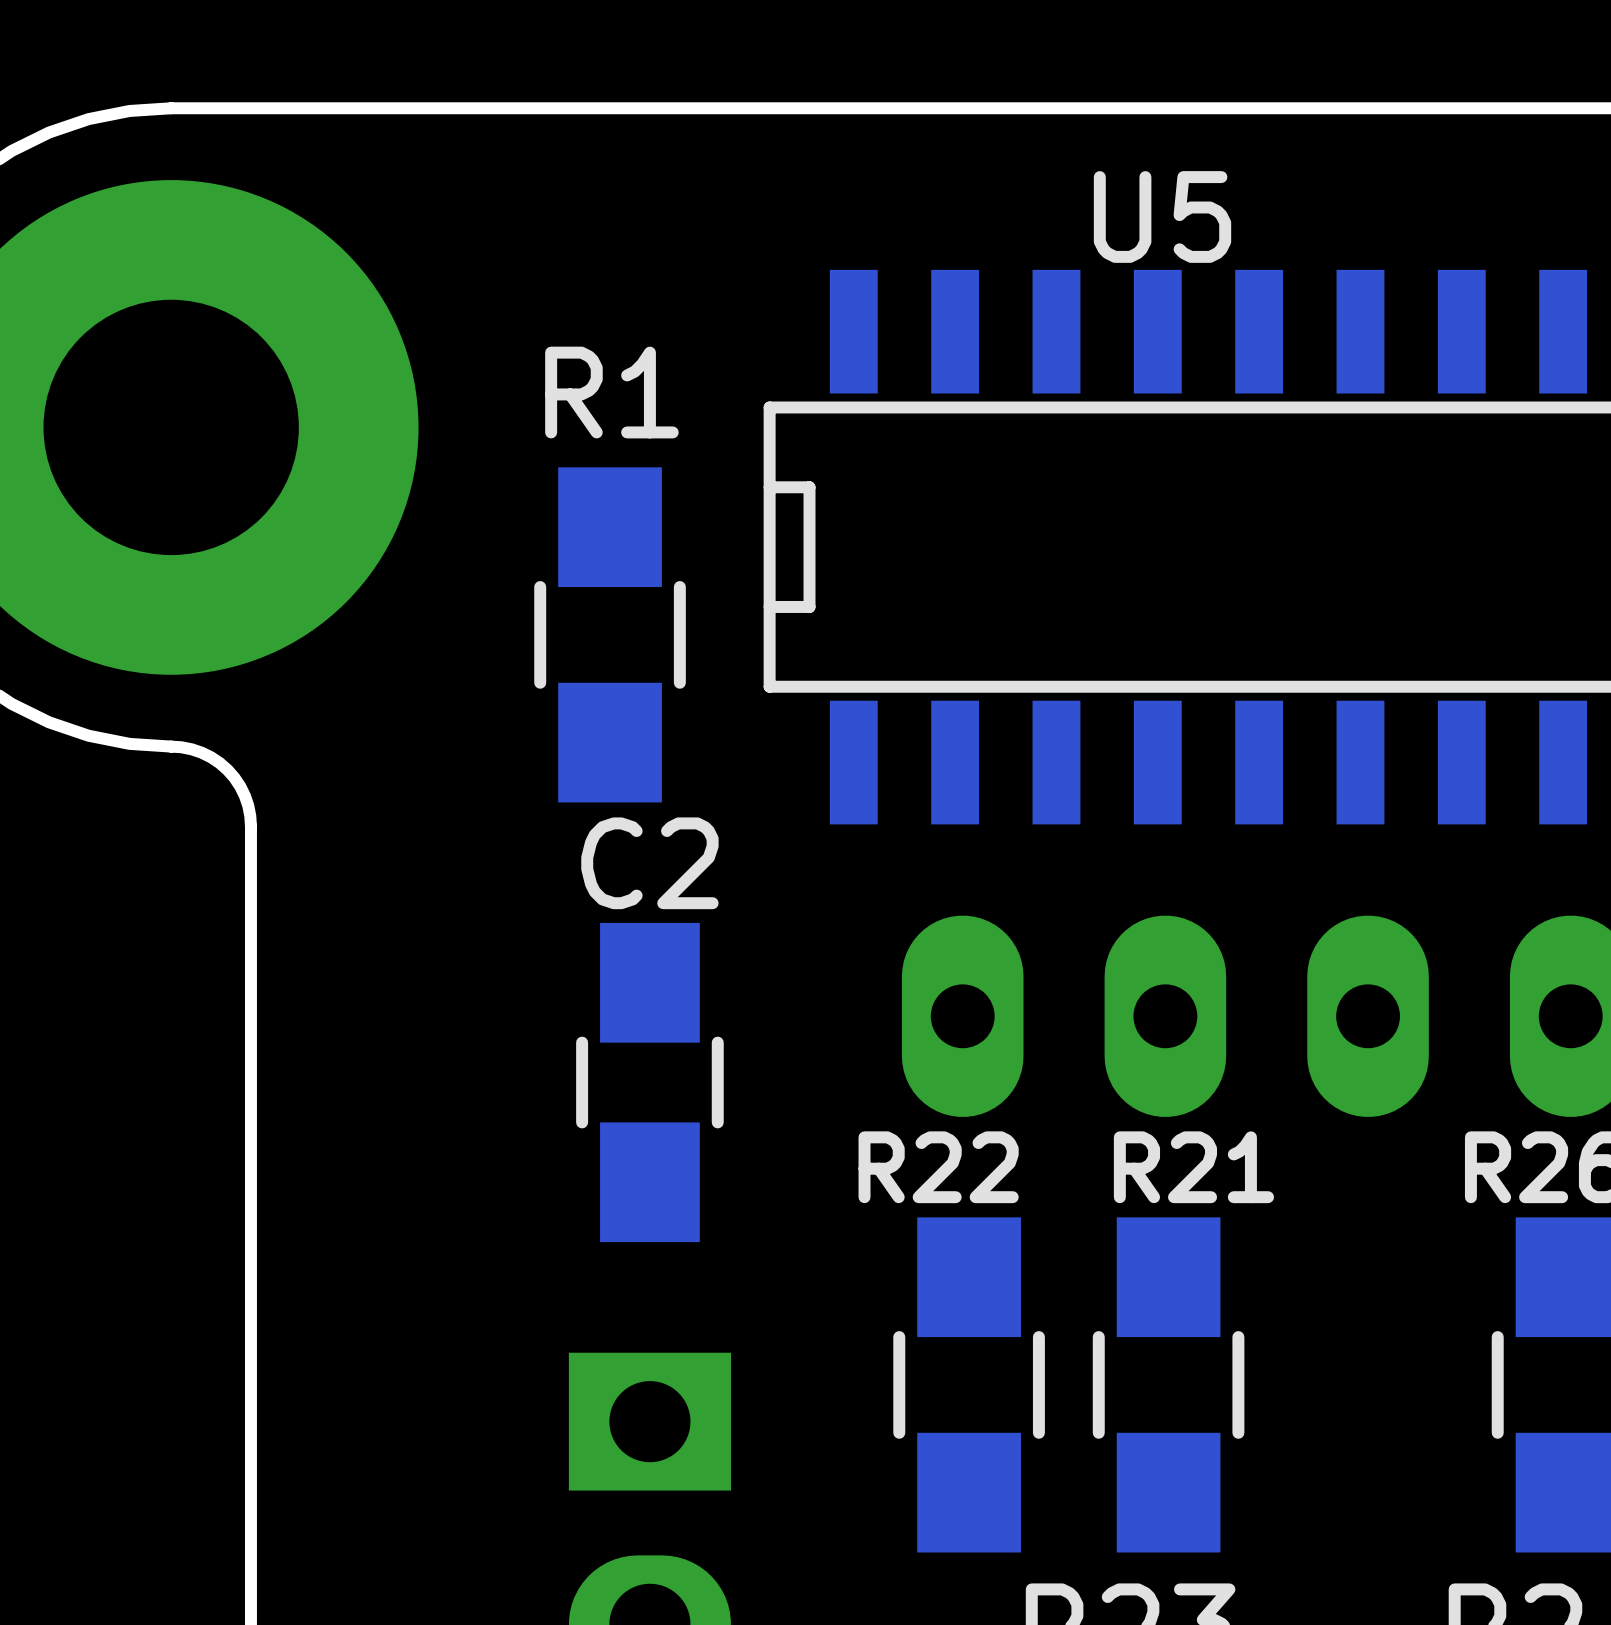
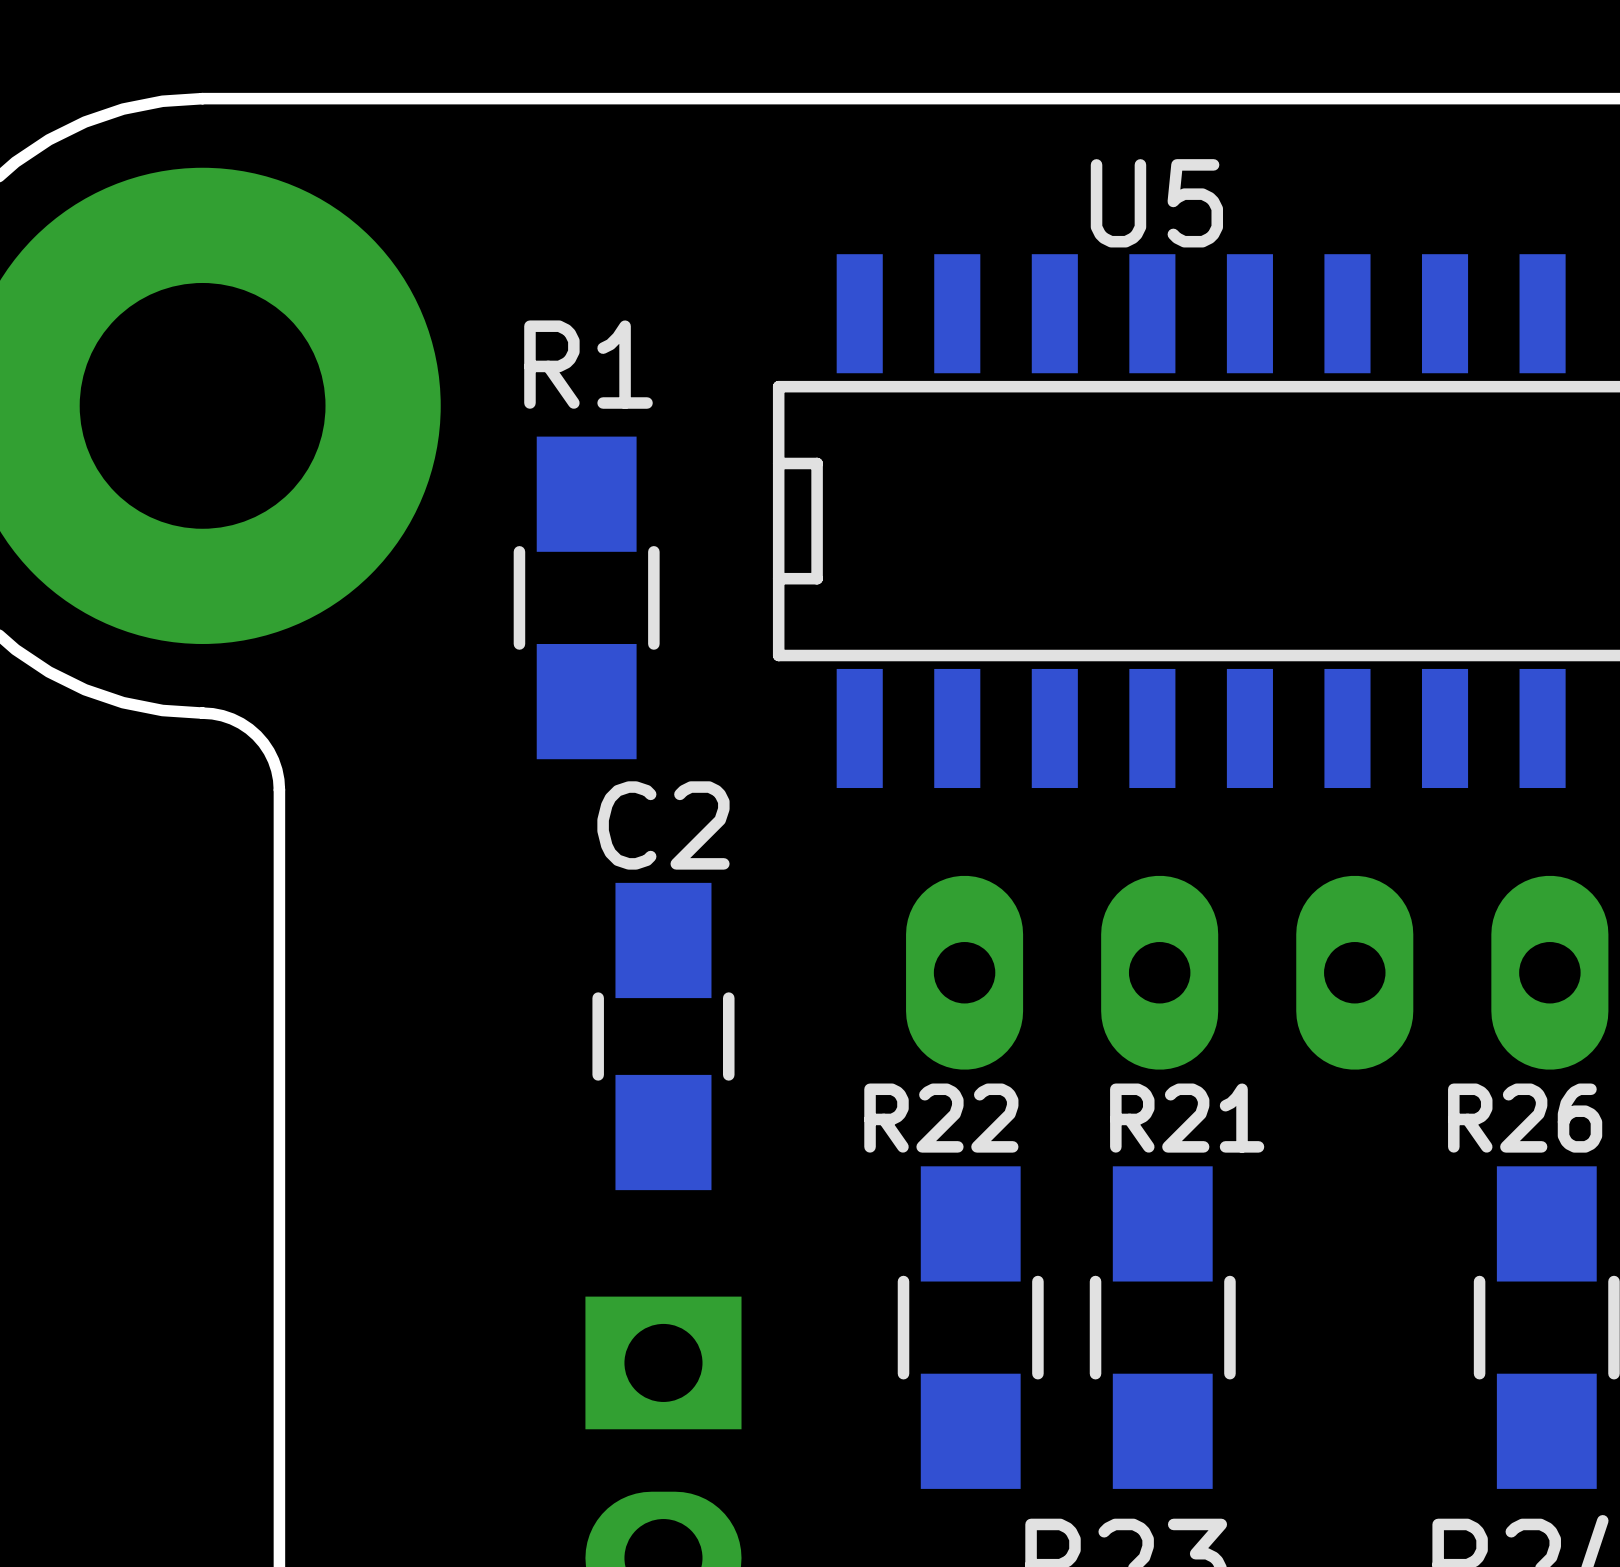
R1 position: (610, 634) -> (586, 597)

